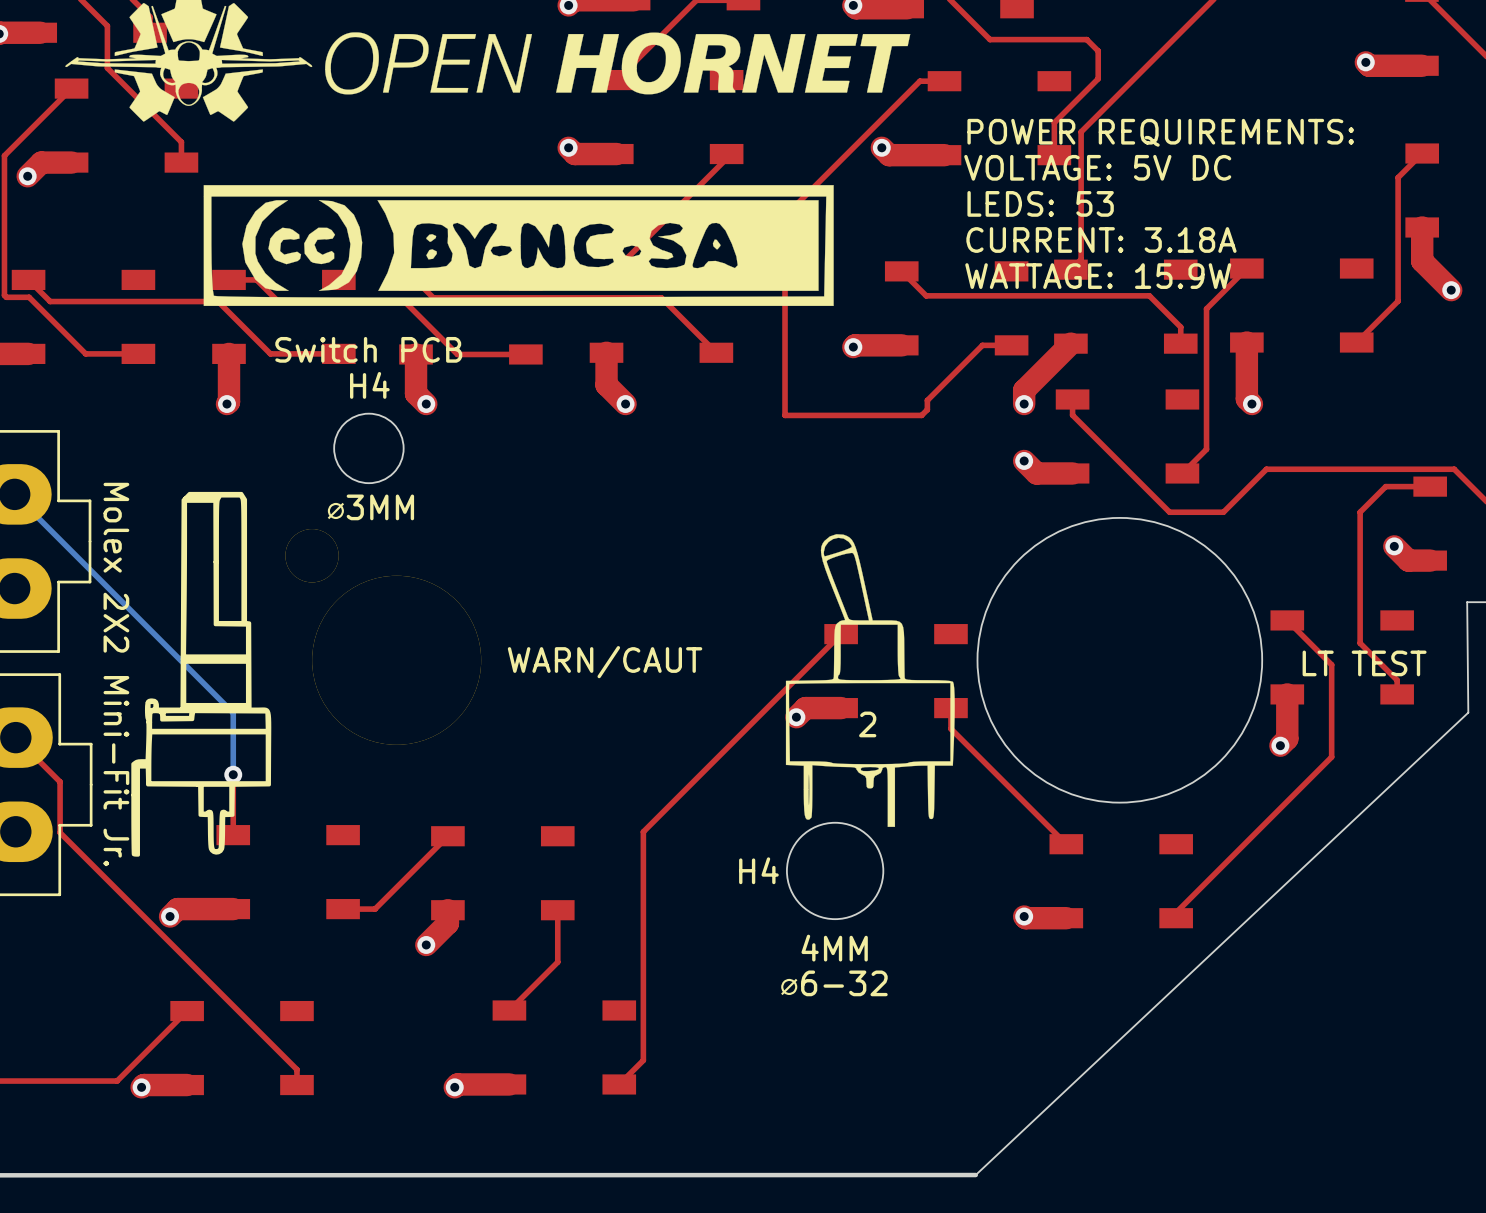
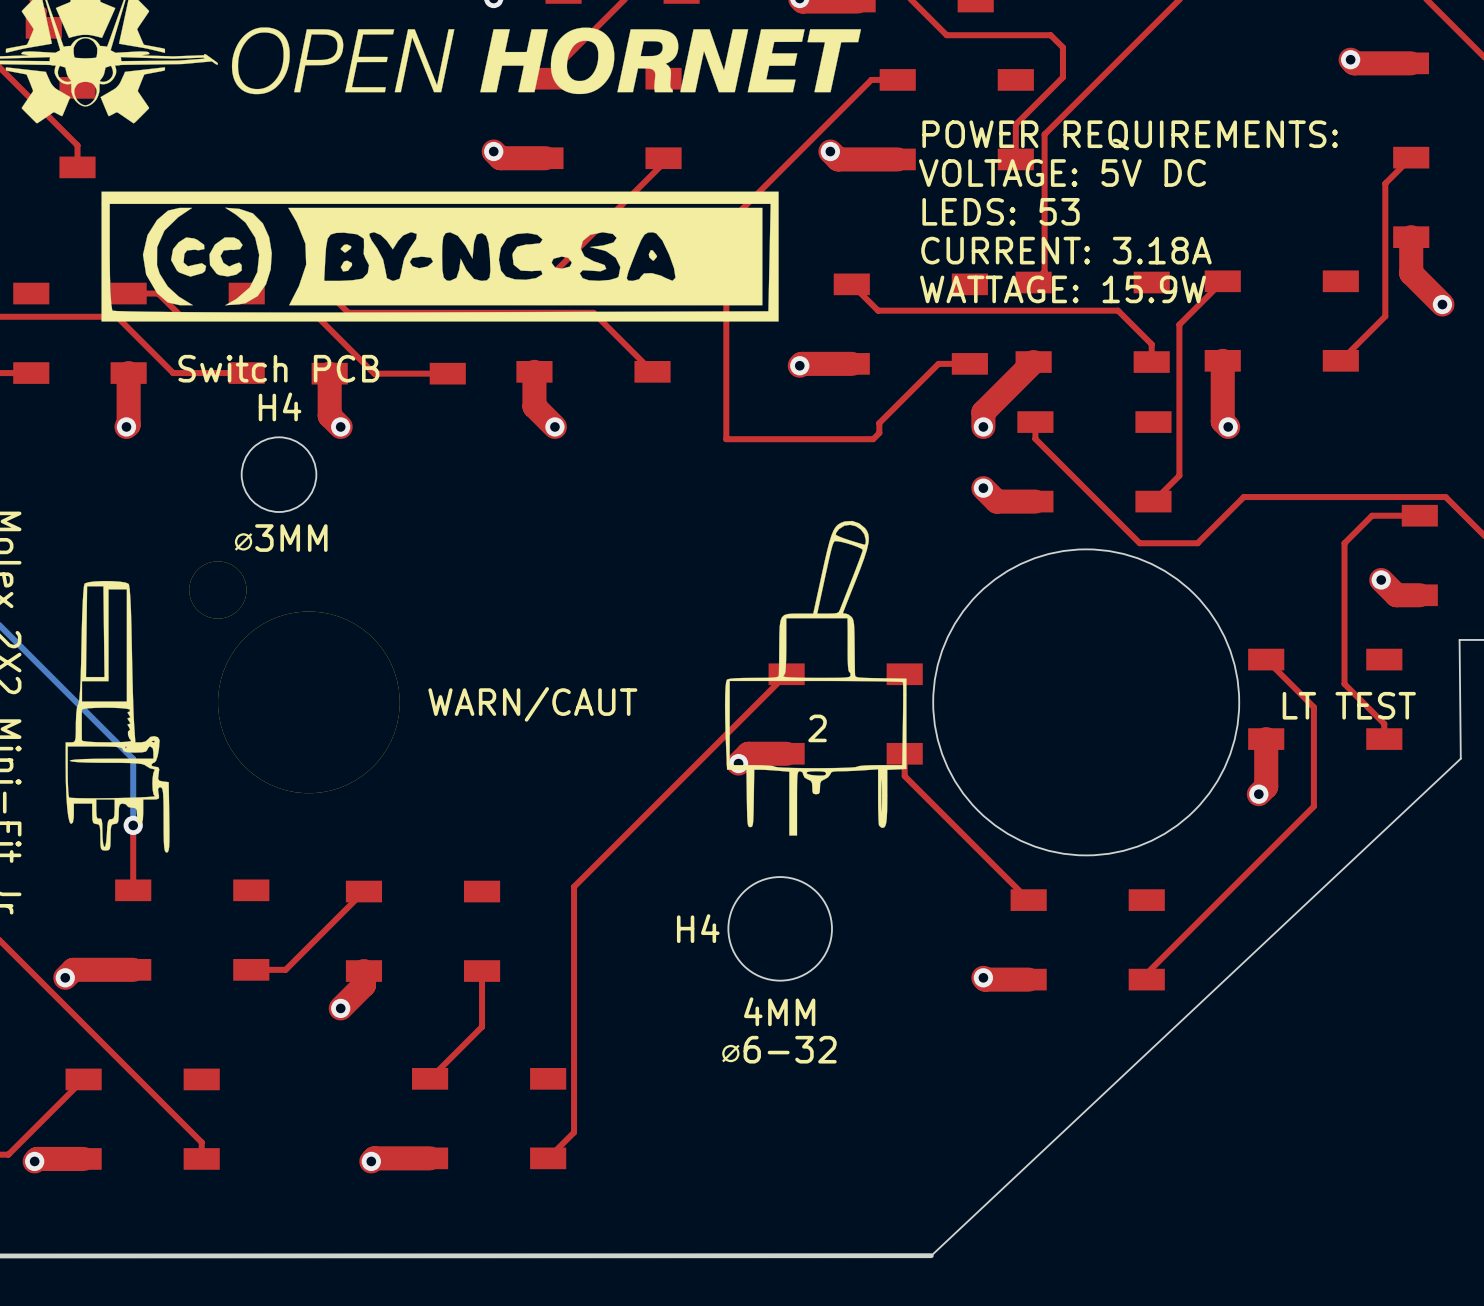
drawing shape: [131, 491, 272, 857] -> [65, 580, 170, 853]
drawing: none -> [724, 520, 907, 836]
drawing: [785, 534, 955, 827] -> none
text position: 2 (867, 724) -> 2 (817, 728)

